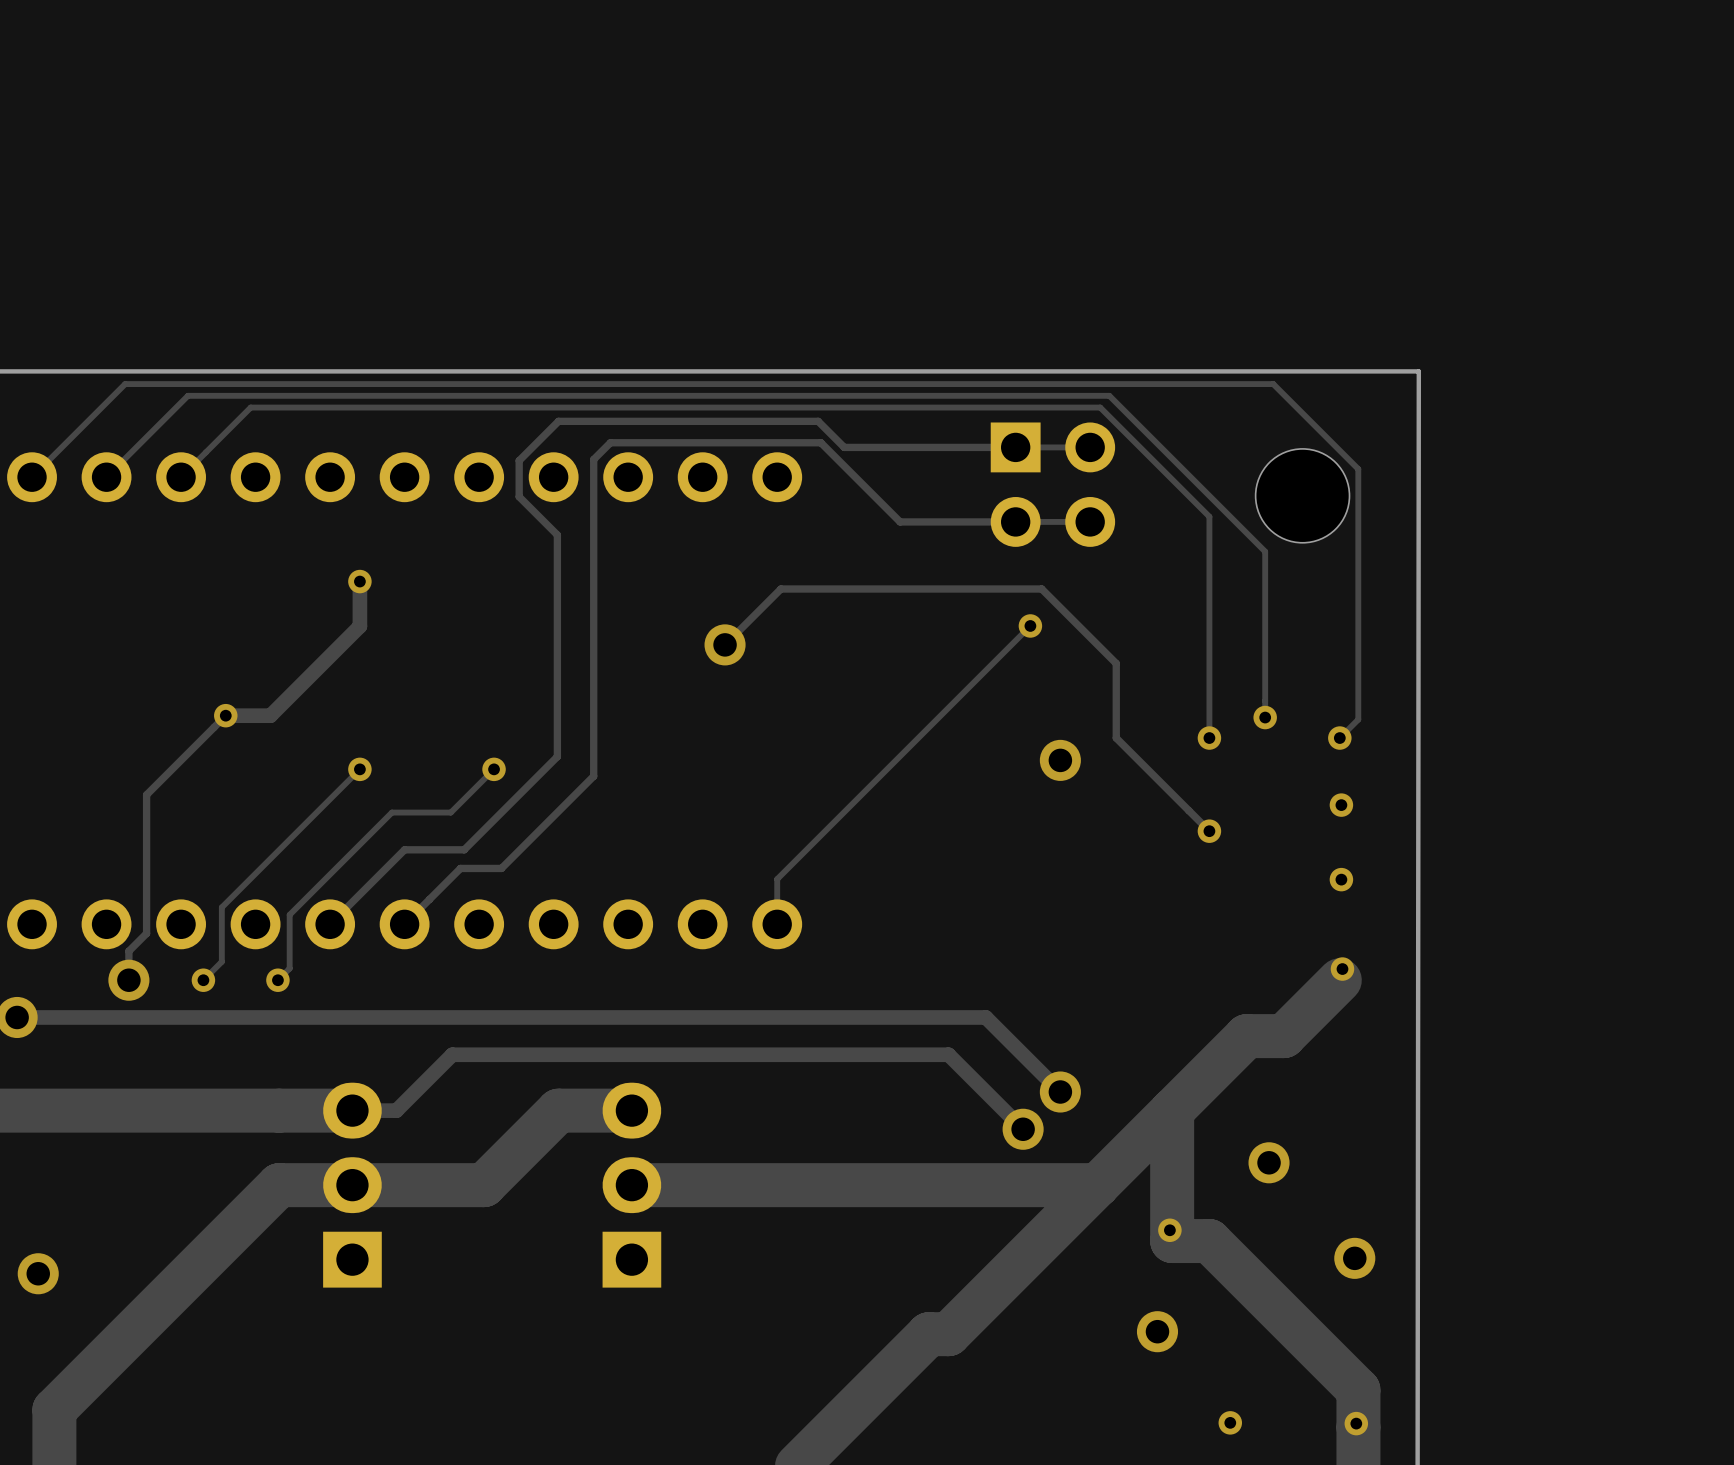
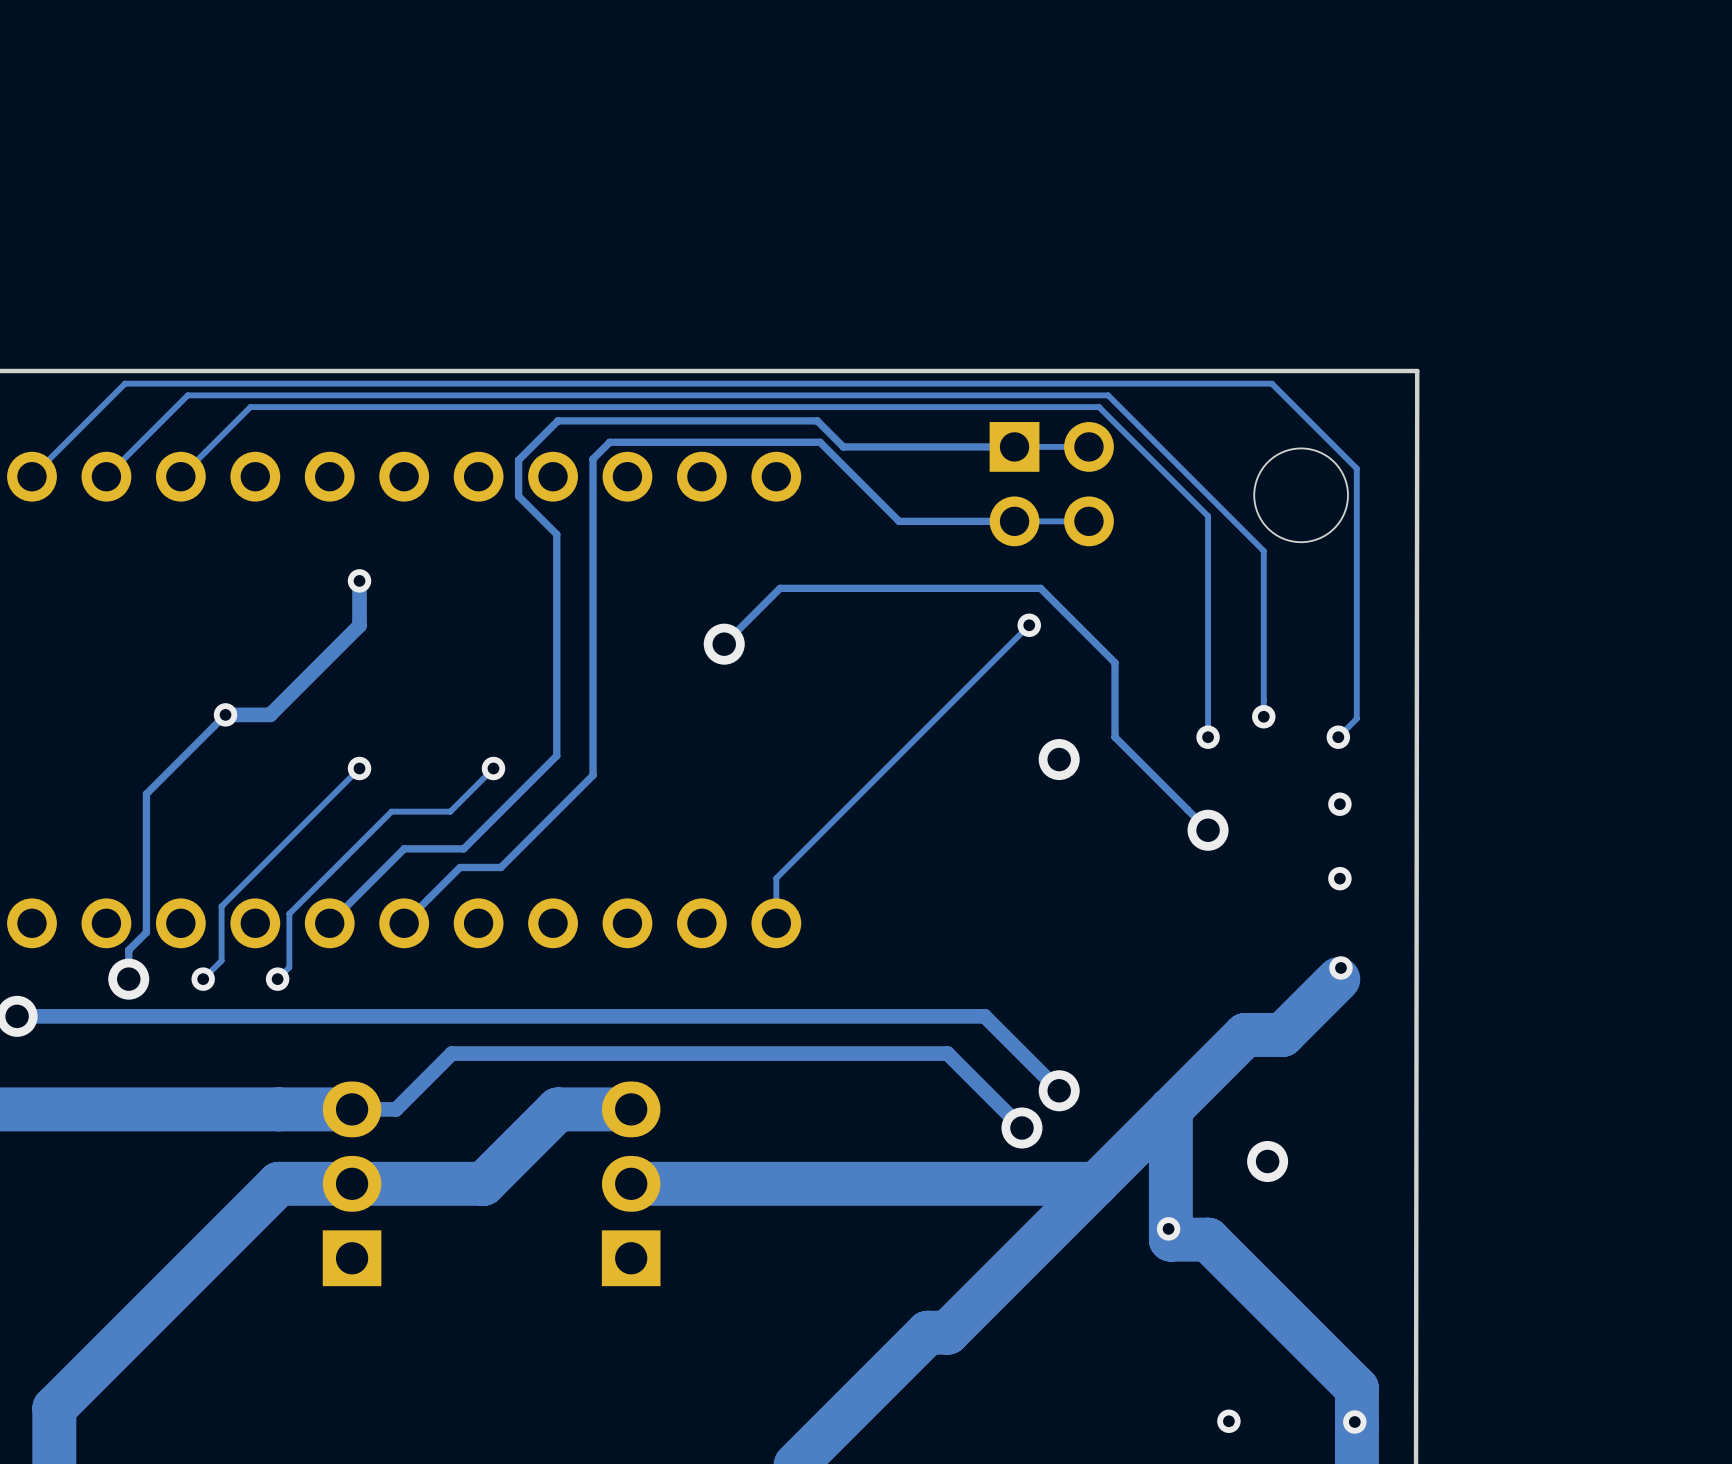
via size: [1197, 819, 1222, 843] -> [1187, 809, 1229, 851]
via: (1354, 1258) -> none
via: (38, 1273) -> none
via: (1157, 1331) -> none

